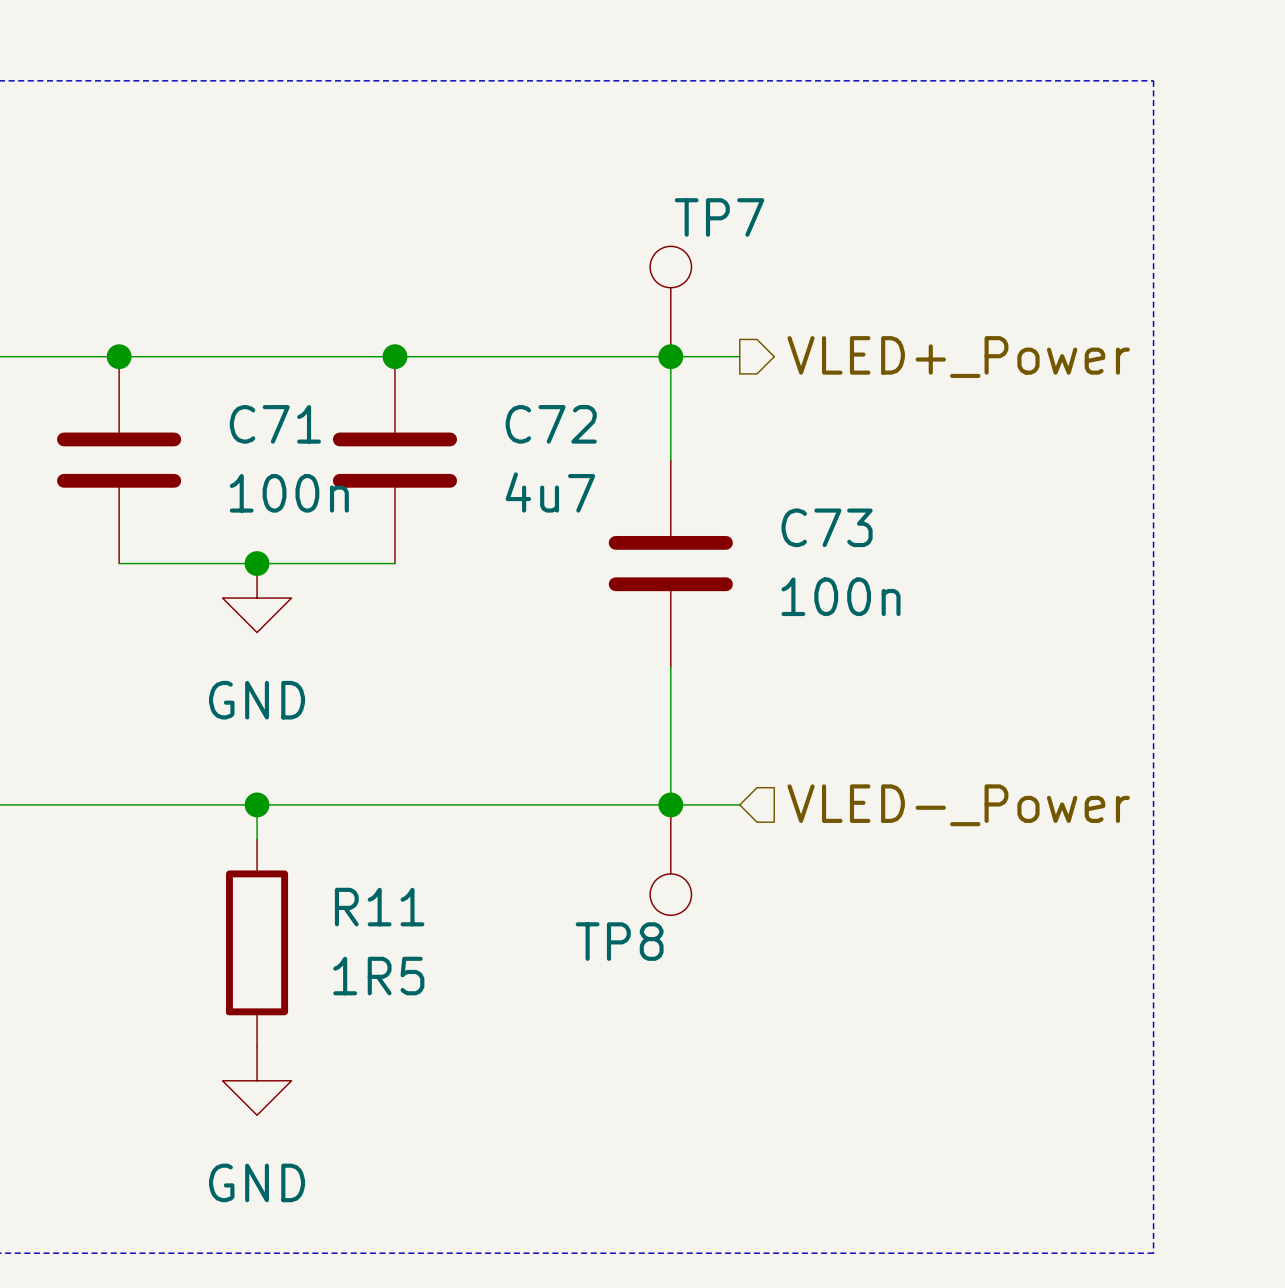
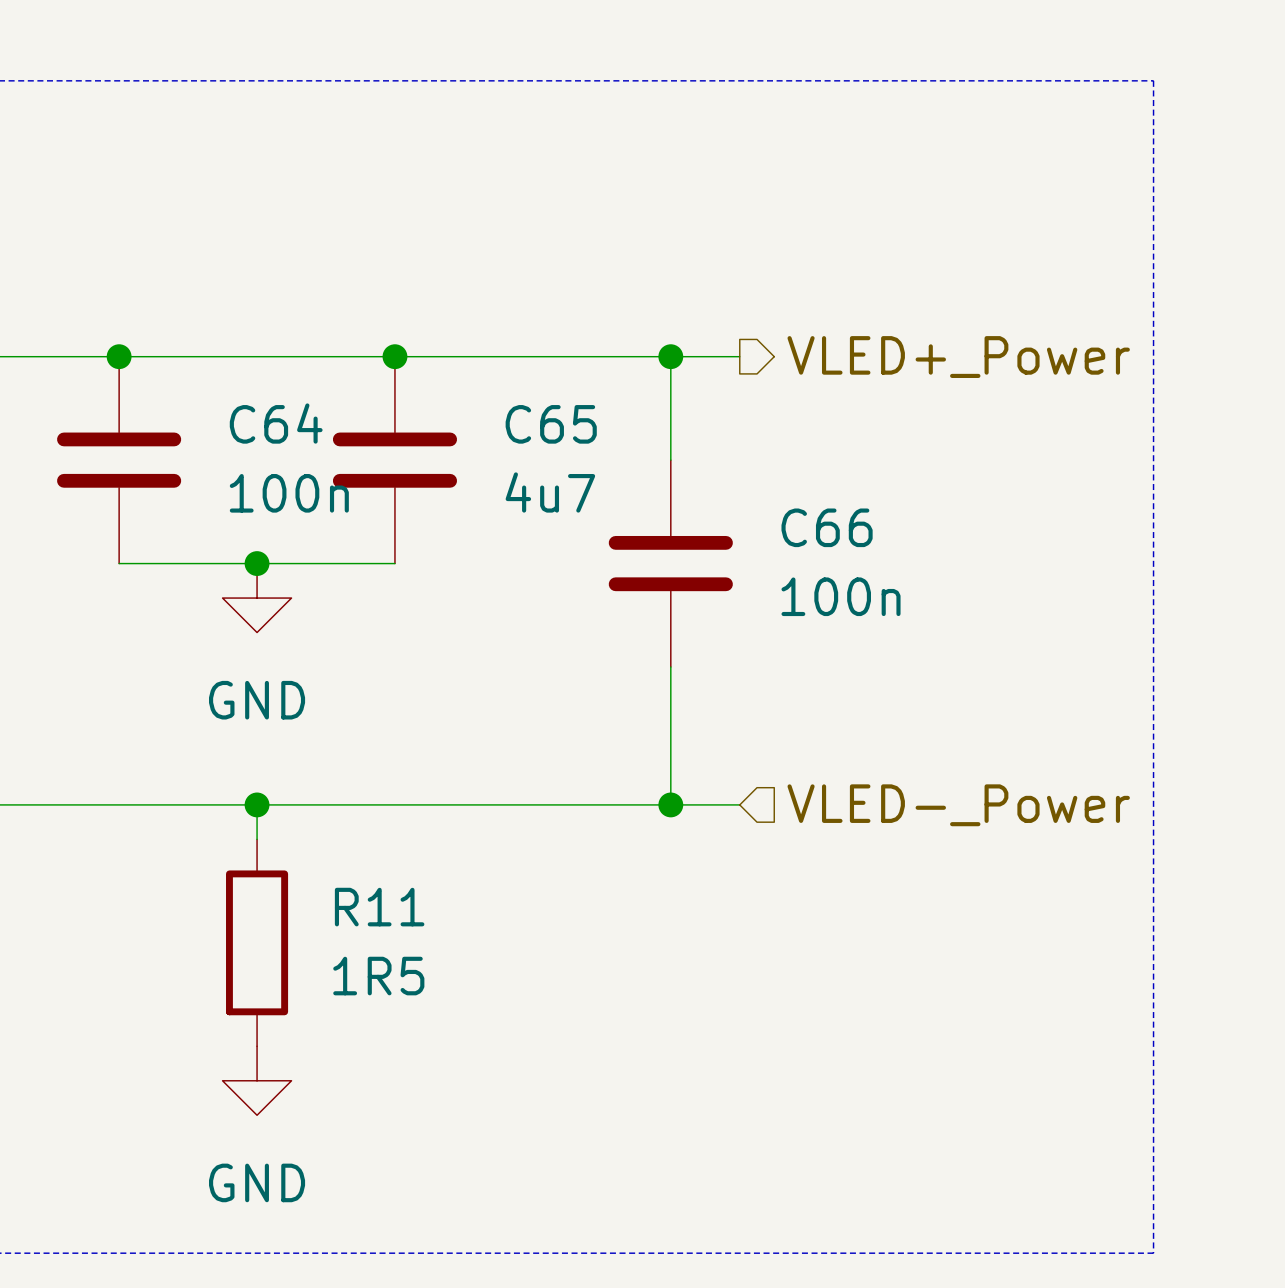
TP7: (670, 301) -> none
C71 name: C71 (275, 424) -> C64 (276, 423)
C72 name: C72 (551, 424) -> C65 (551, 424)
C73 name: C73 (827, 527) -> C66 (827, 527)
TP8: (670, 860) -> none

